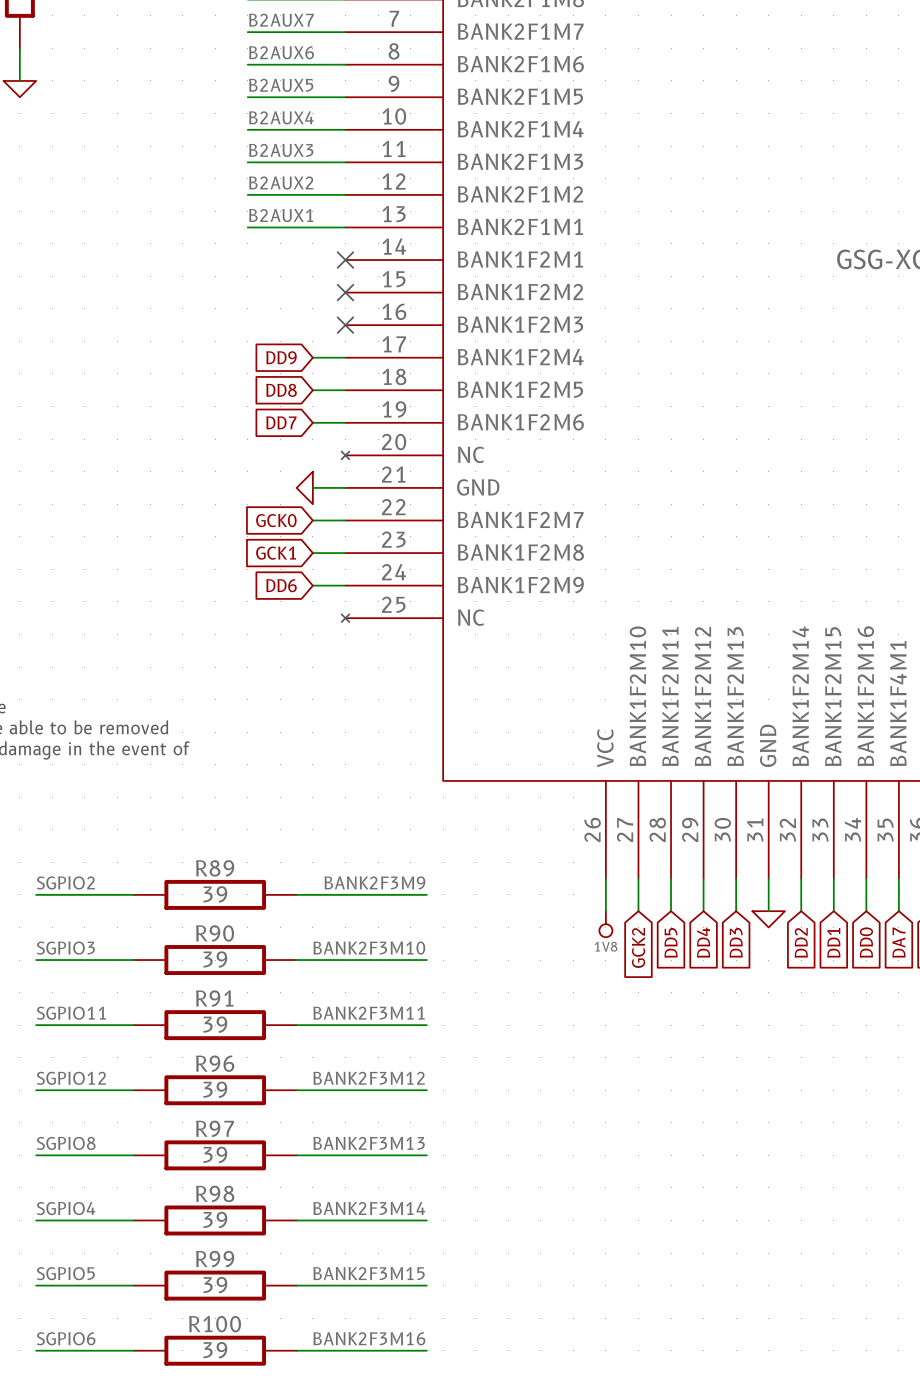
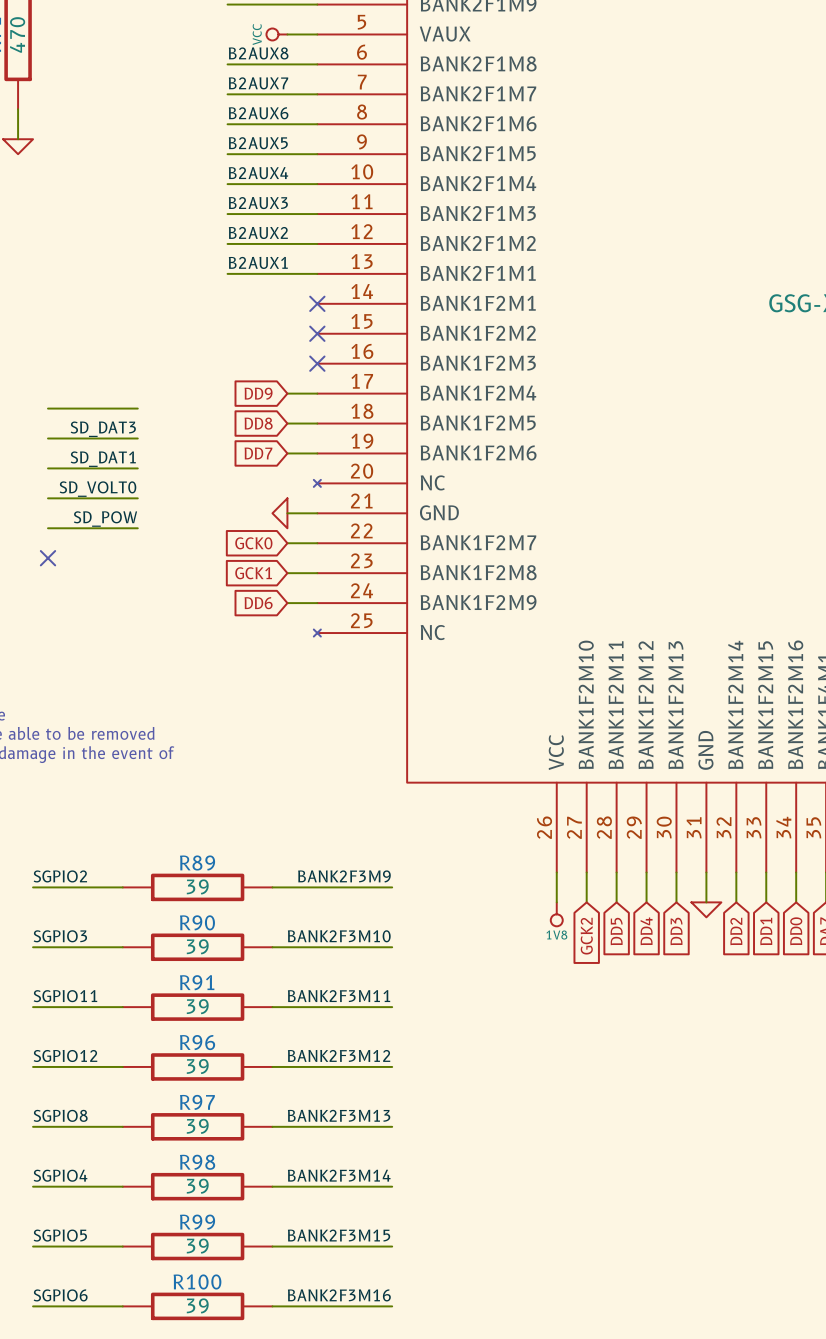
wire: none -> (48, 408) (137, 408)
label: none -> SD_DAT3 (103, 429)
wire: none -> (48, 438) (137, 438)
label: none -> SD_DAT1 (103, 459)
wire: none -> (48, 468) (137, 468)
label: none -> SD_VOLT0 (97, 489)
wire: none -> (48, 498) (137, 498)
label: none -> SD_POW (105, 519)
wire: none -> (48, 528) (137, 528)
no-connect mark: none -> (48, 558)

